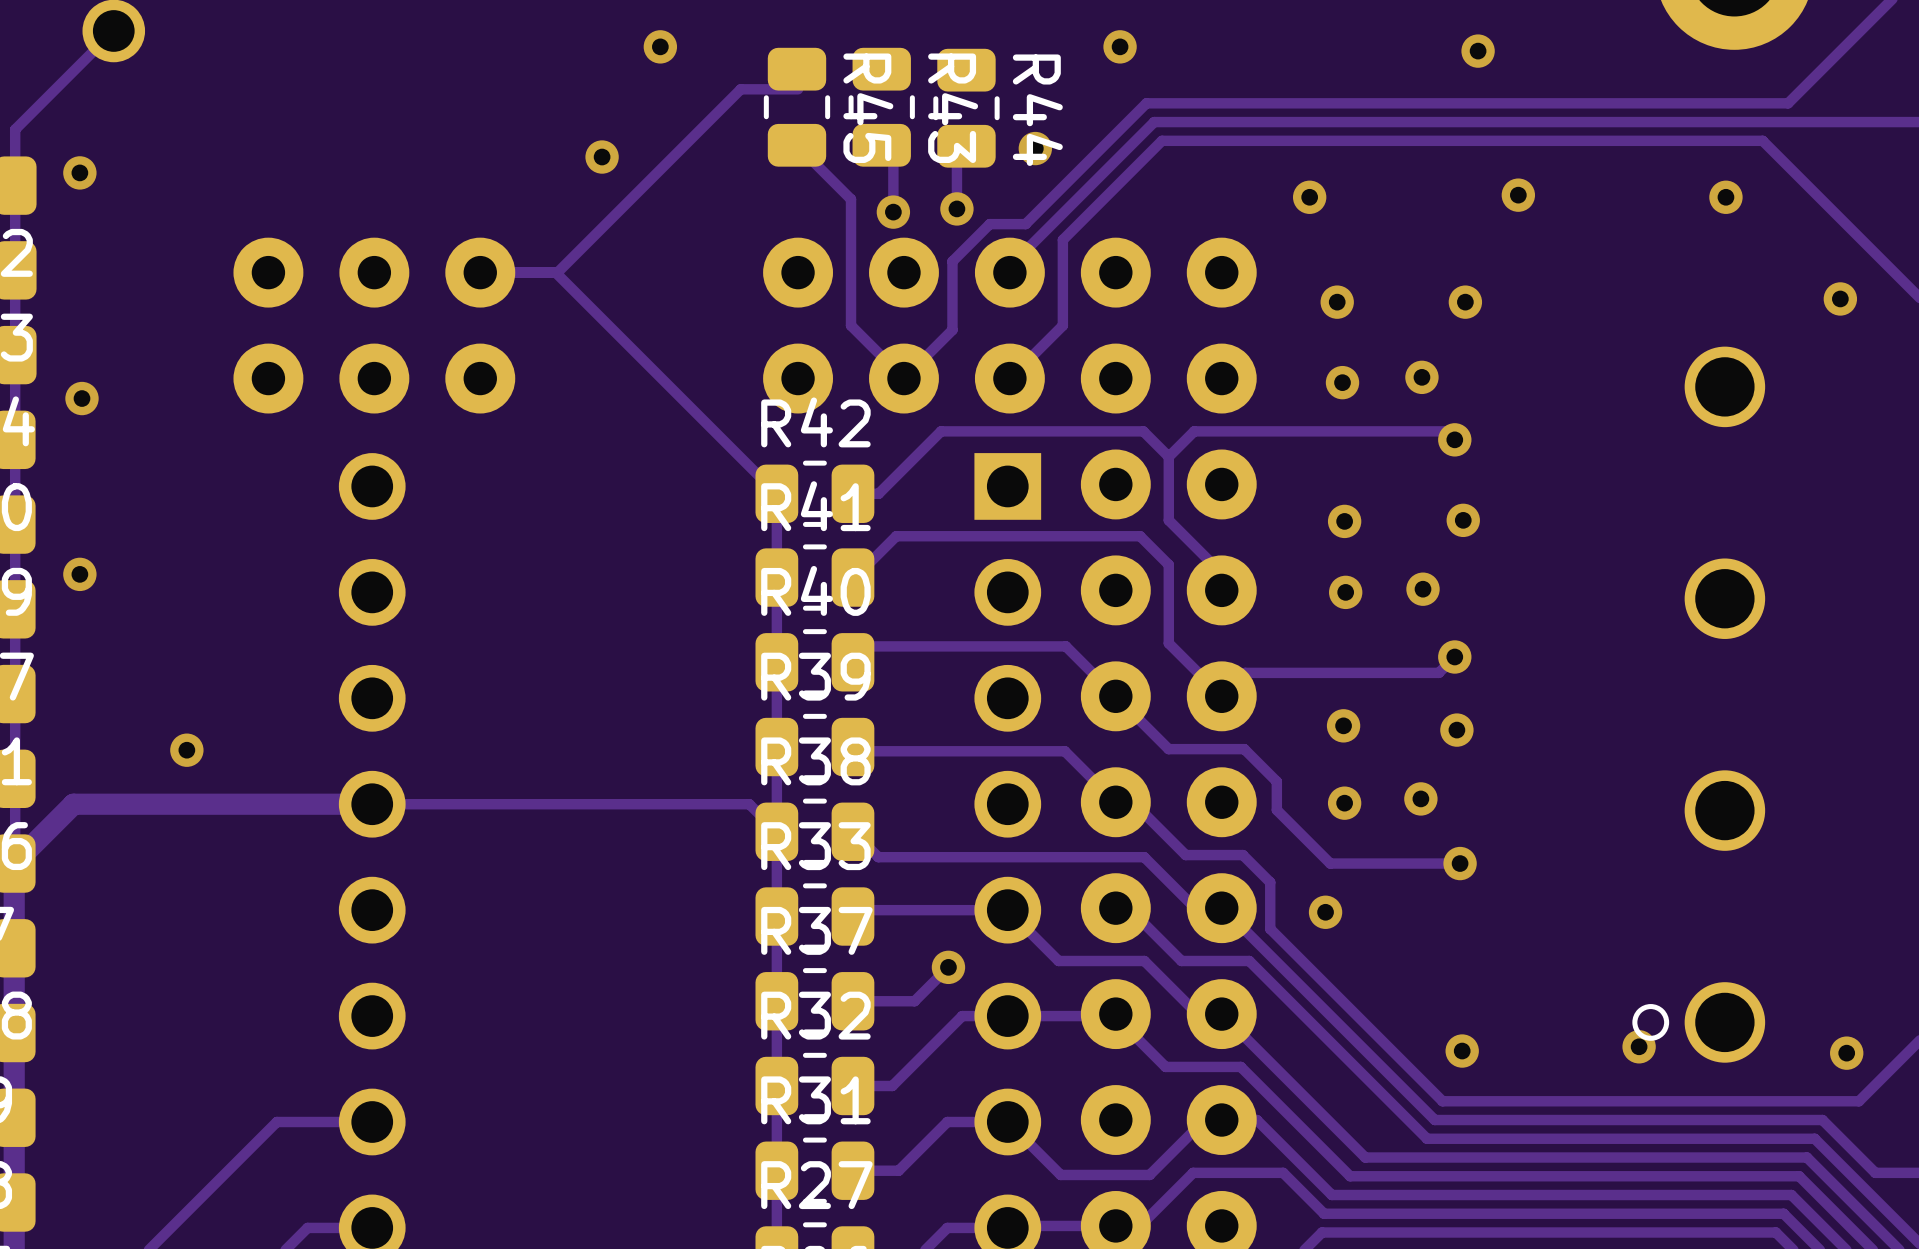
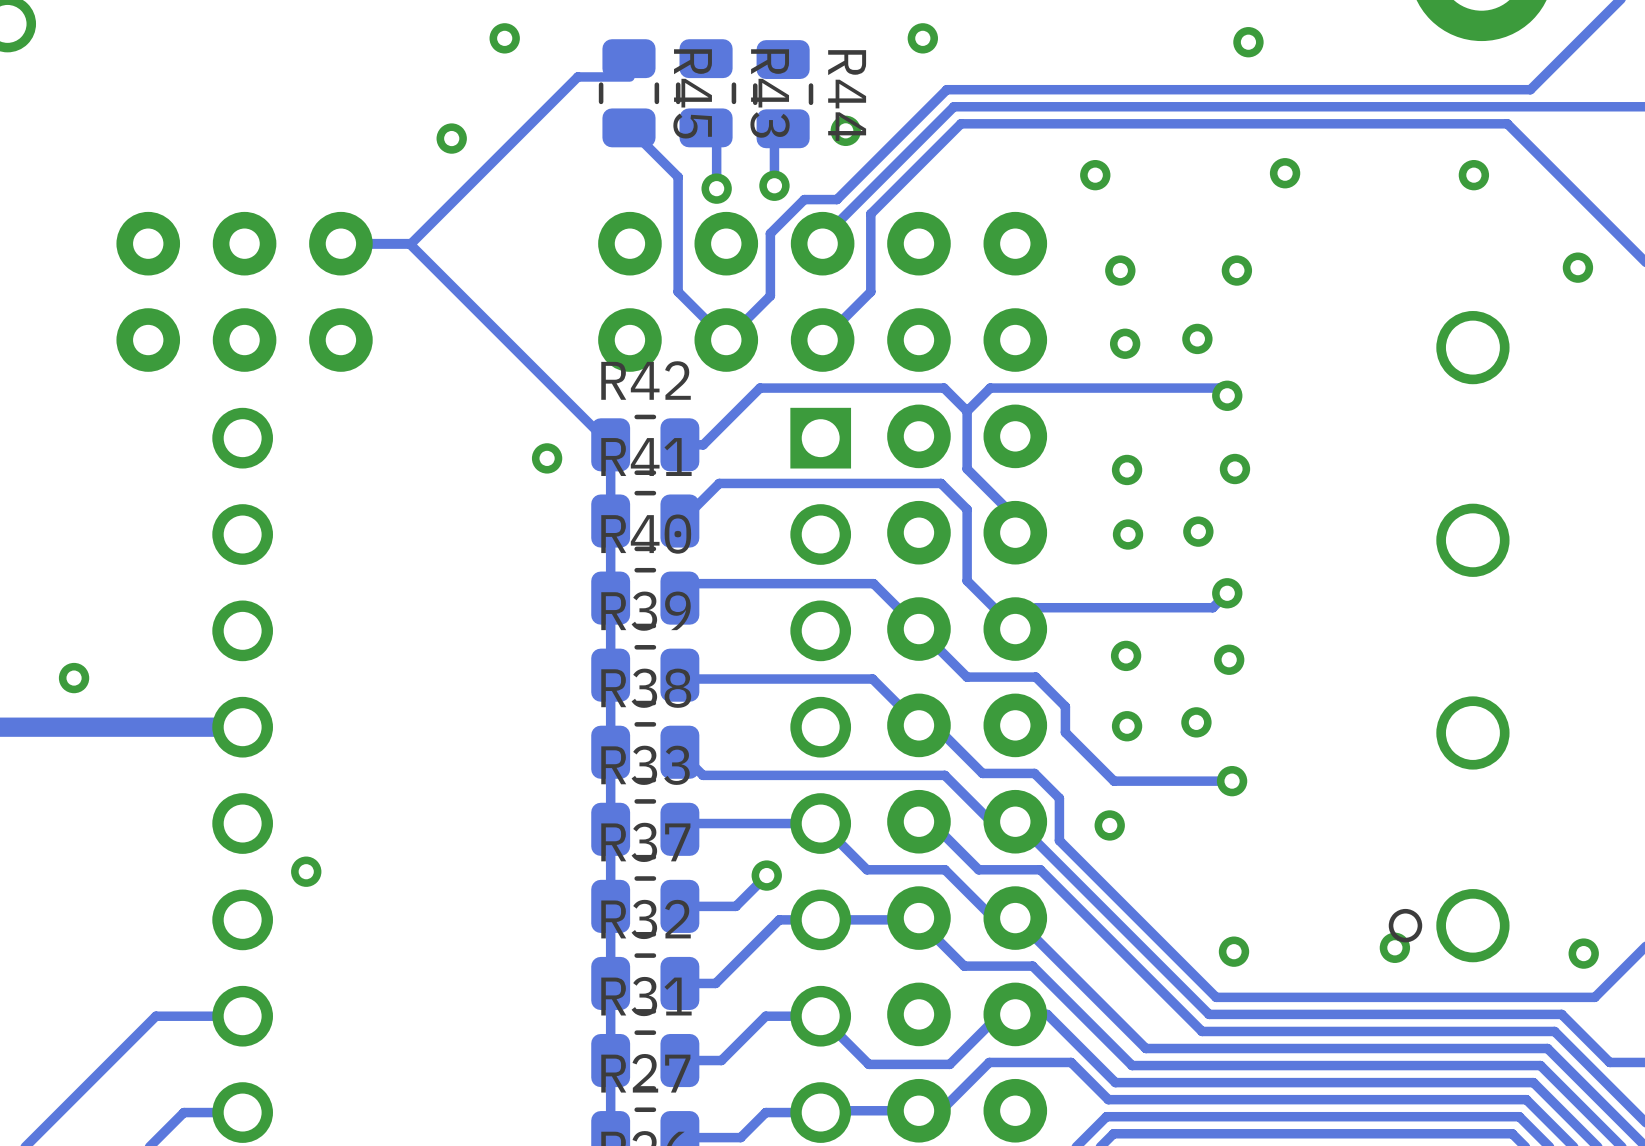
via: none -> (547, 458)
track: (372, 804) (749, 804) (776, 831) -> none
via: none -> (306, 871)

